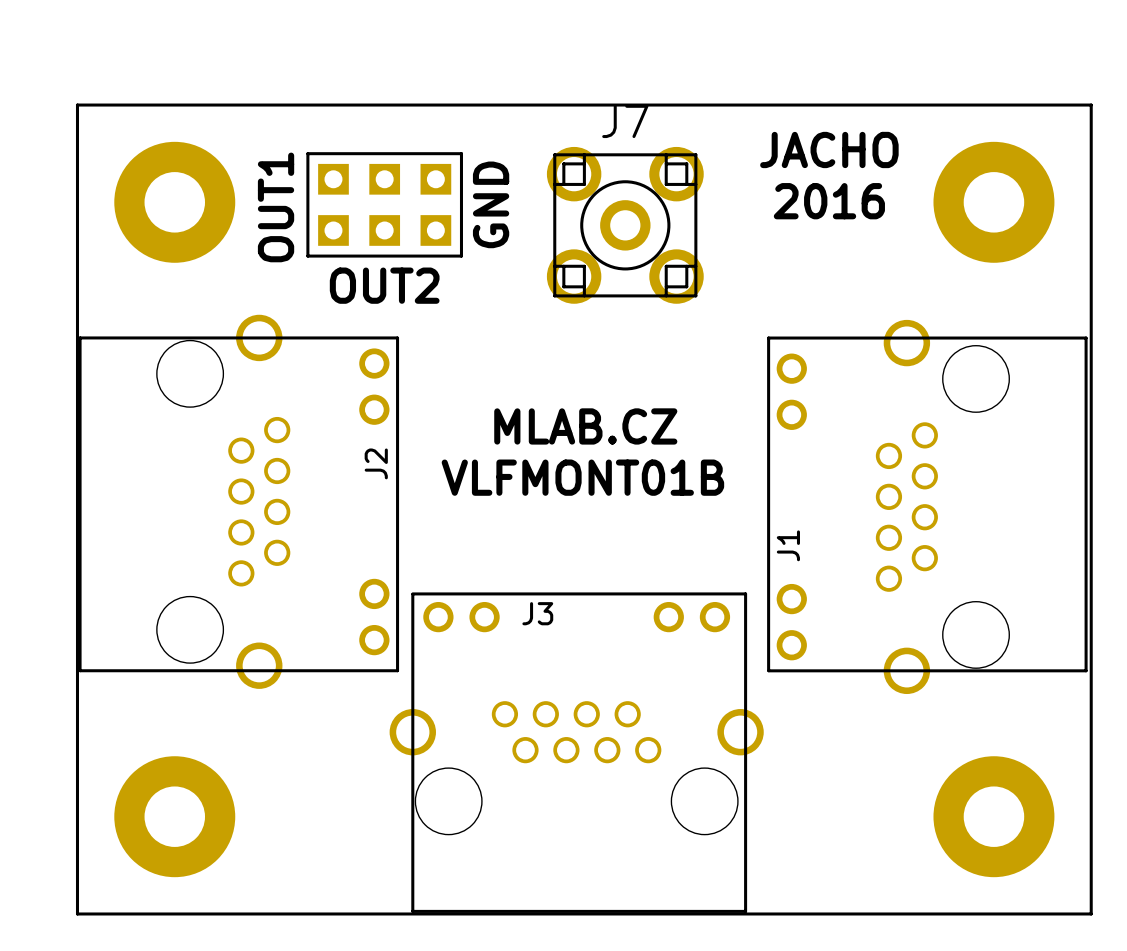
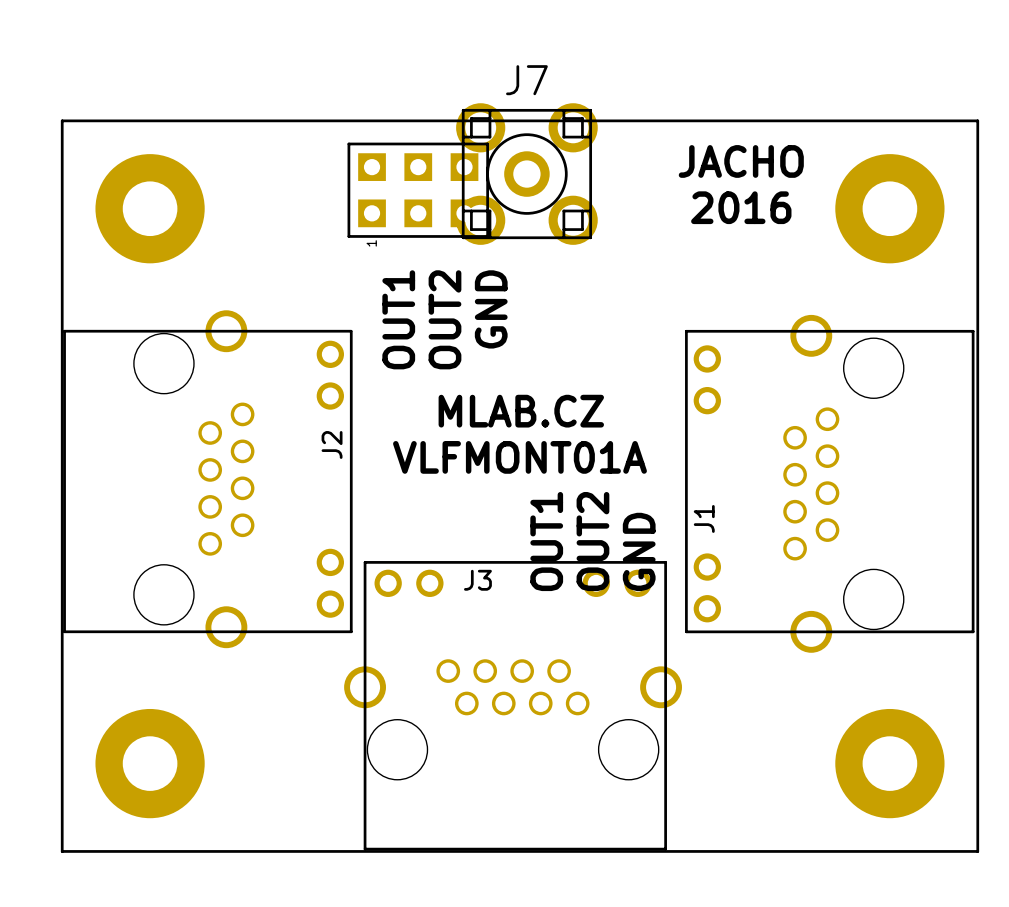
part: none -> (418, 190)
part: (384, 204) -> none
text position: GND (491, 204) -> GND (491, 309)
text position: OUT1 (276, 207) -> OUT1 (398, 319)
J7 position: (625, 225) -> (526, 174)
text rotation: 0° (384, 285) -> 90° counterclockwise (444, 319)
text: VLFMONT01B (582, 477) -> VLFMONT01A (519, 457)
text: none -> OUT1 (546, 541)
text: none -> OUT2 (592, 541)
text: none -> GND (639, 551)

